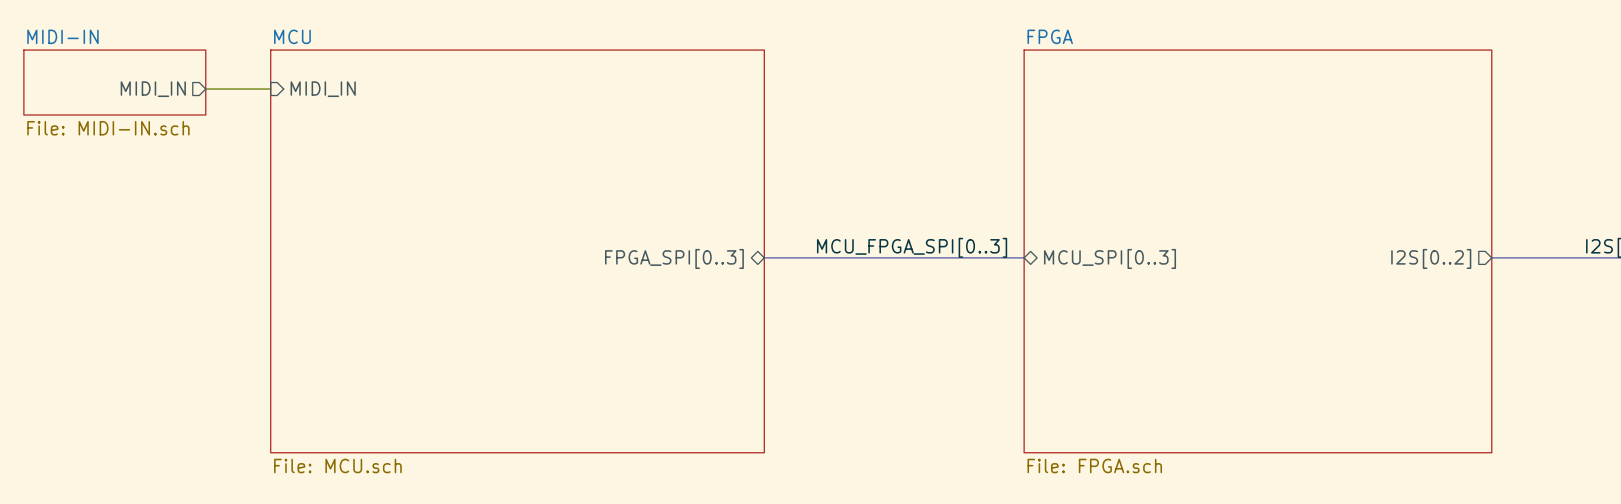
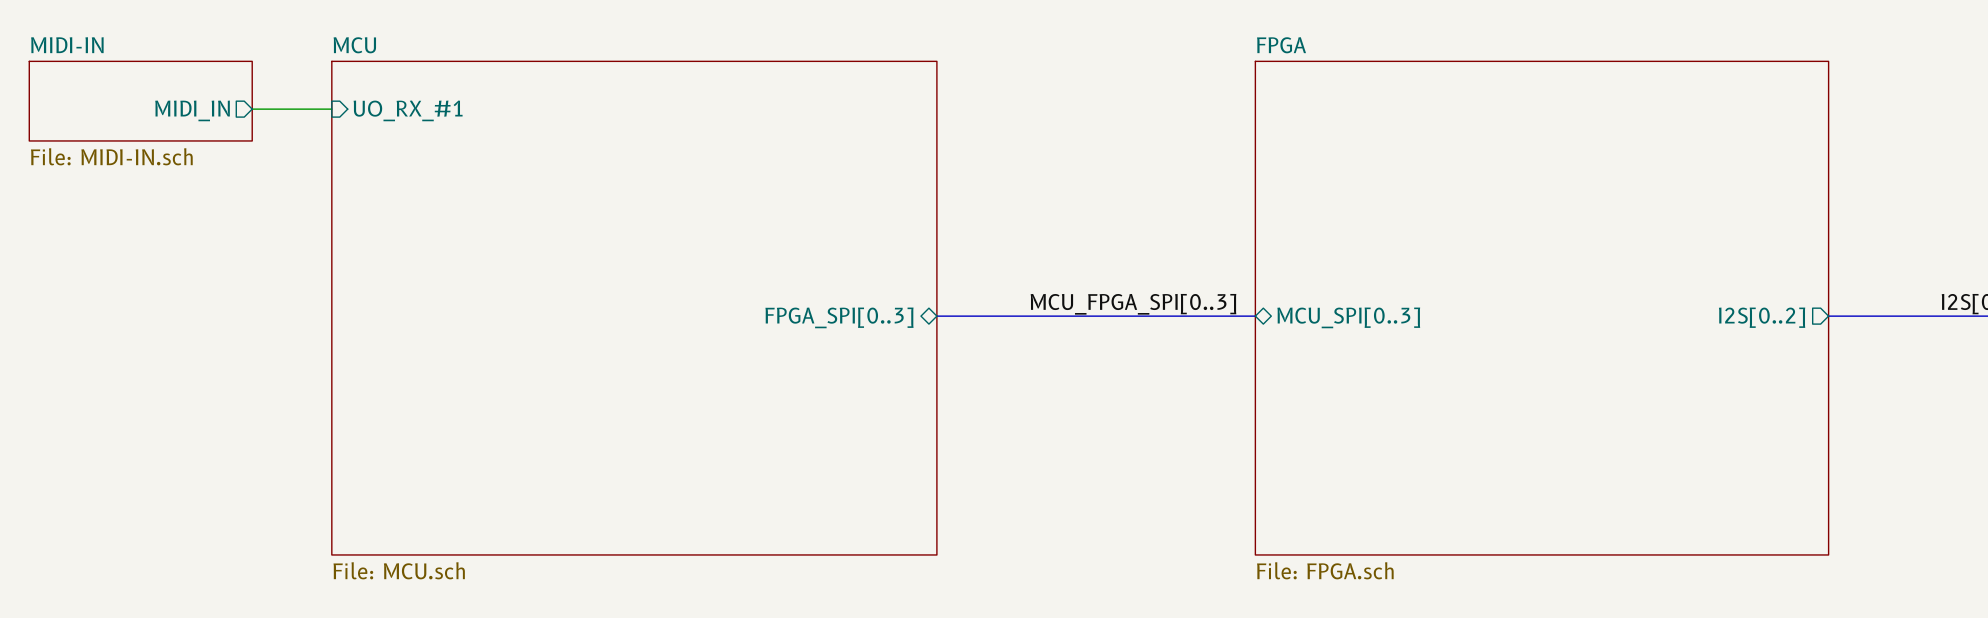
sheet pin: MIDI_IN (323, 89) -> UO_RX_#1 (408, 110)

